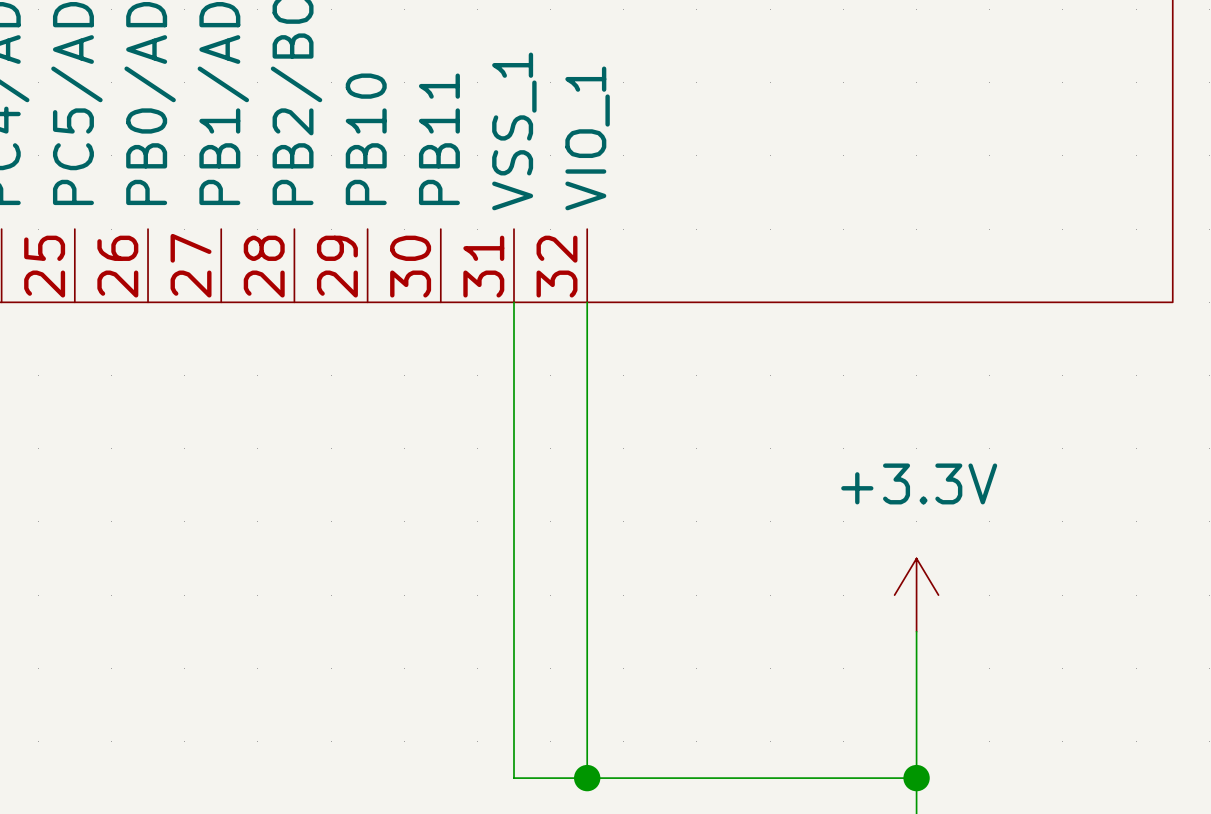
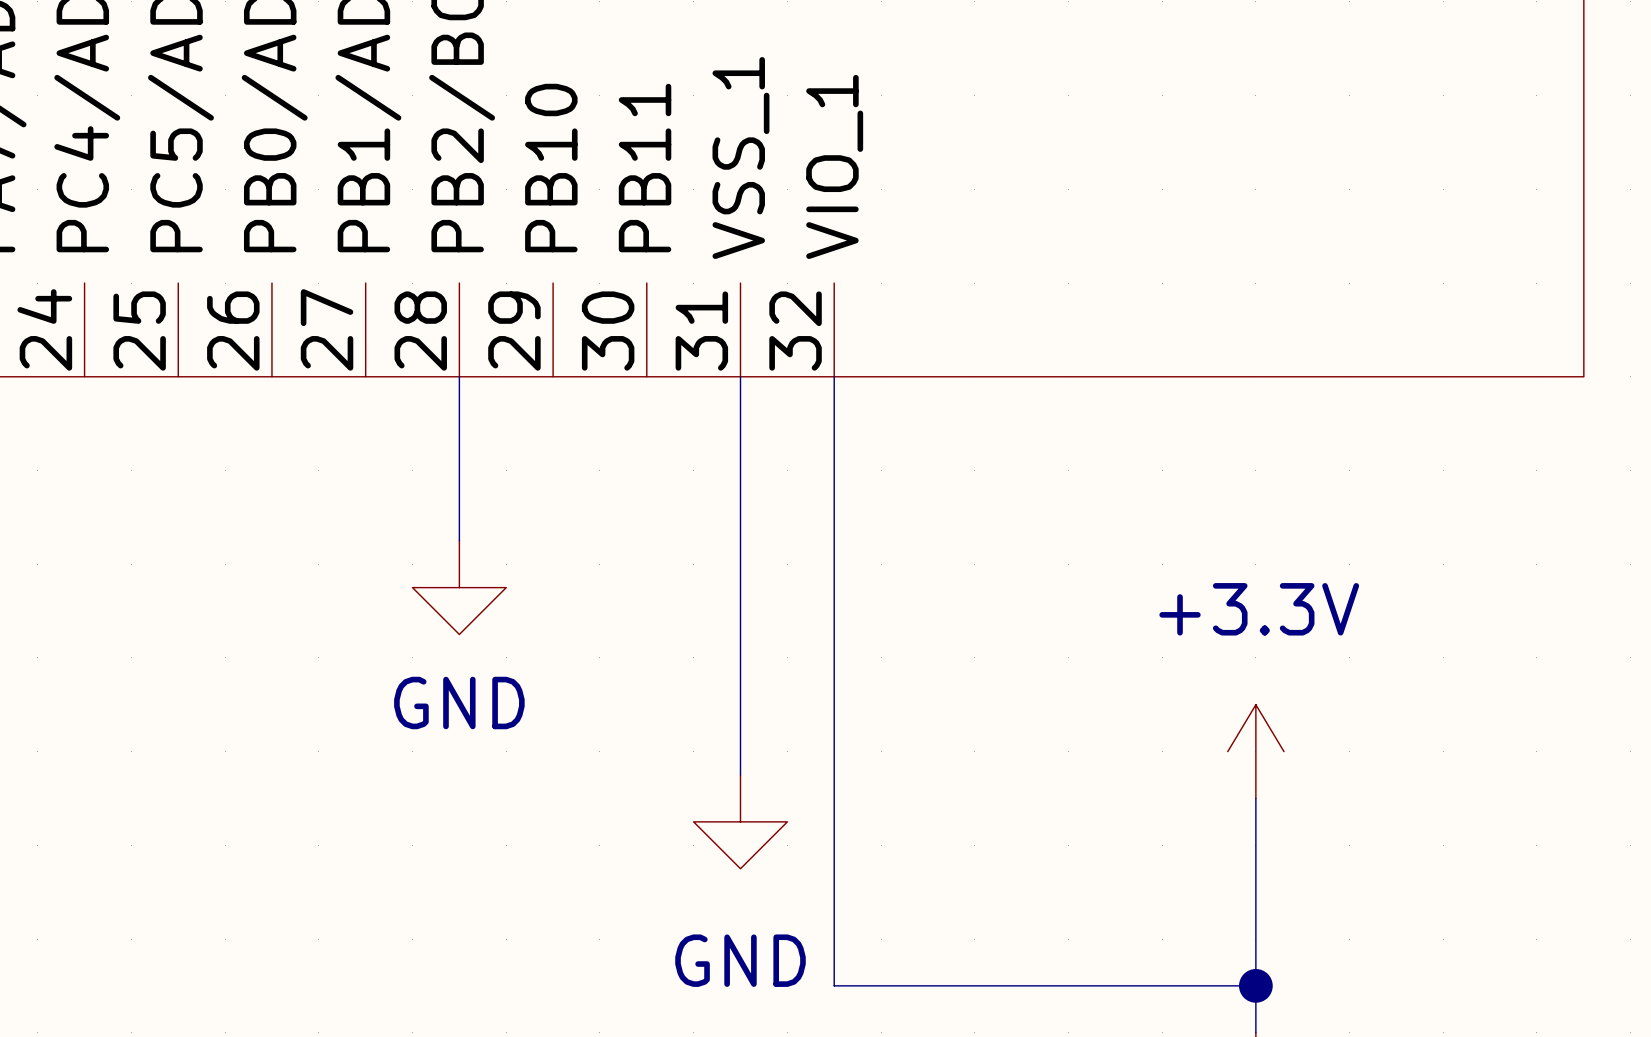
wire: none -> (459, 376) (459, 540)
power symbol: none -> GND (459, 587)
wire: (513, 613) (513, 778) (587, 778) -> none
power symbol: none -> GND (740, 821)
junction: (587, 778) -> none

